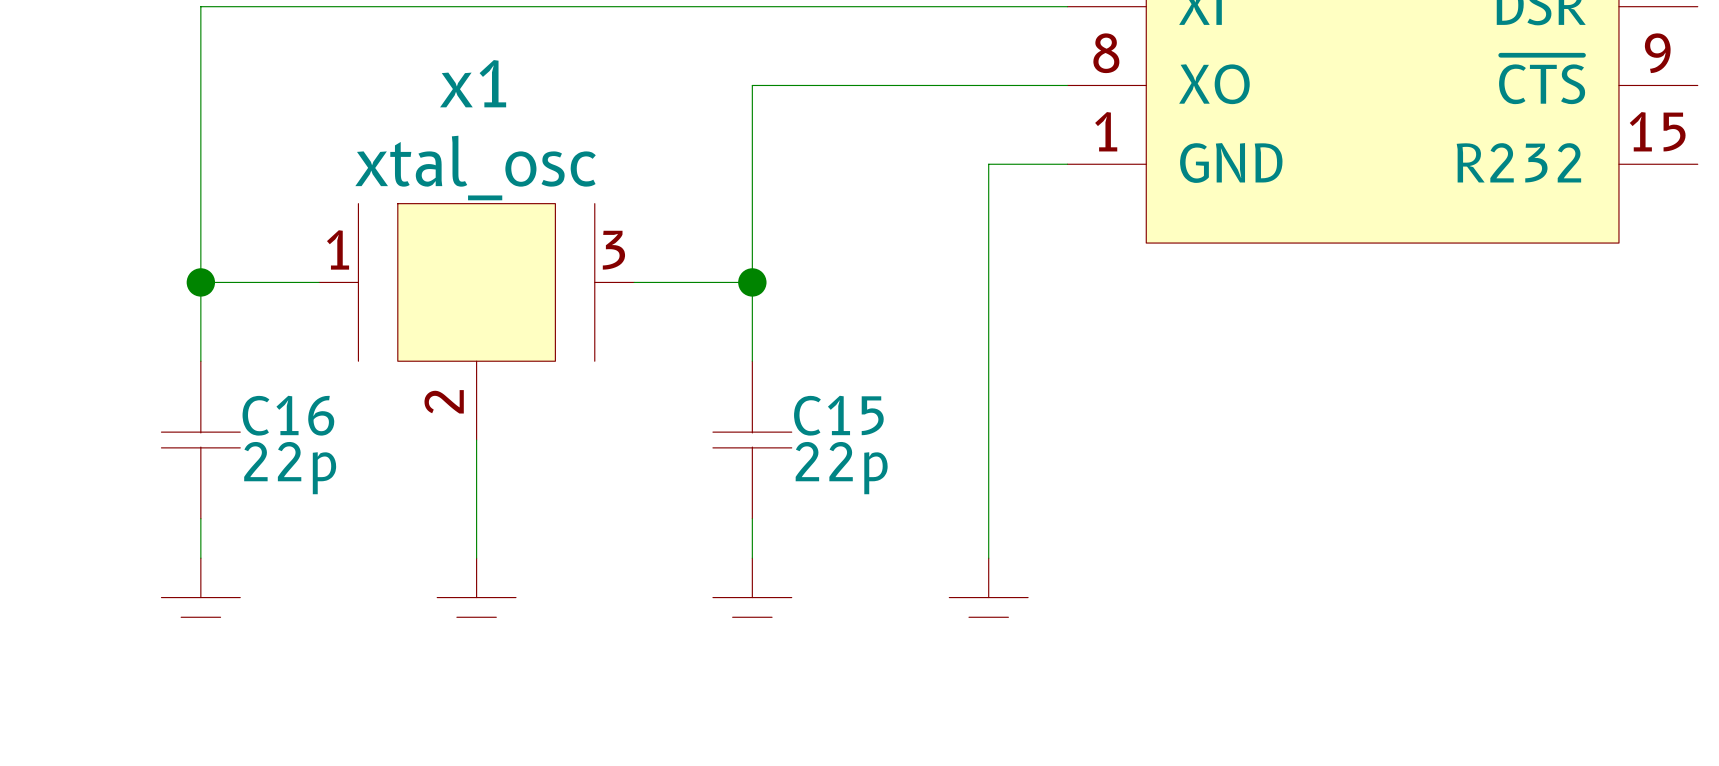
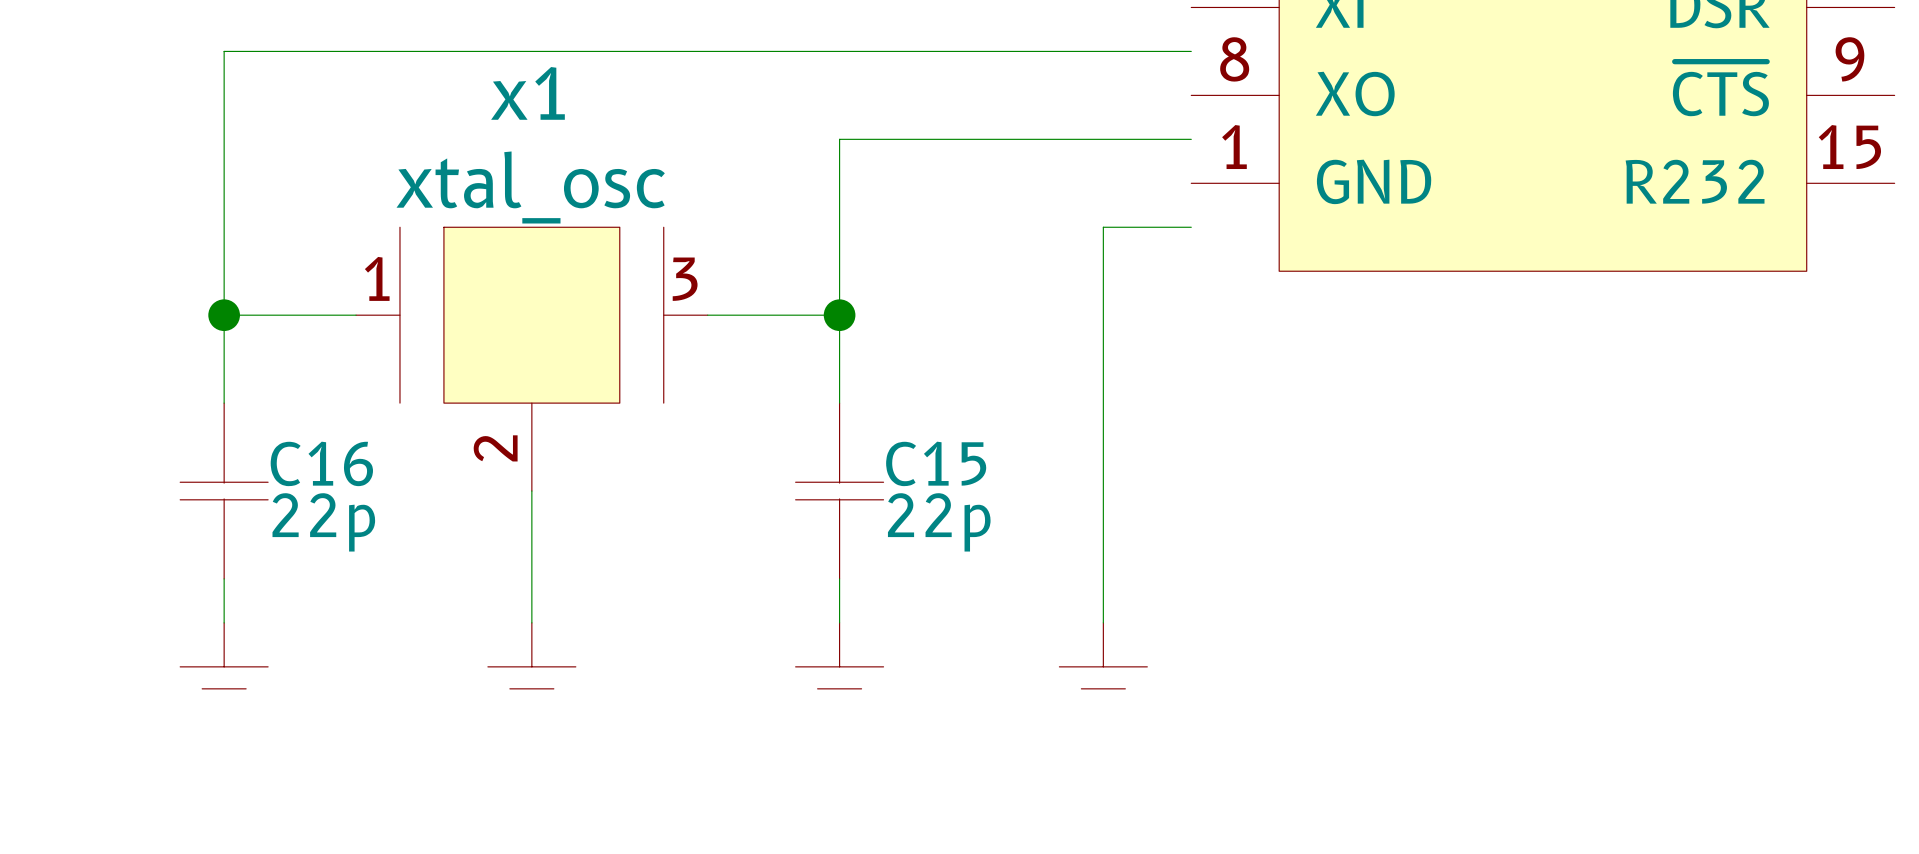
wire: (1067, 6) (200, 6) (200, 46) -> (1191, 51) (224, 51)
wire: (1067, 85) (752, 85) (752, 124) -> (1191, 139) (839, 139)
wire: (1067, 164) (988, 164) (988, 203) -> (1191, 227) (1103, 227)

